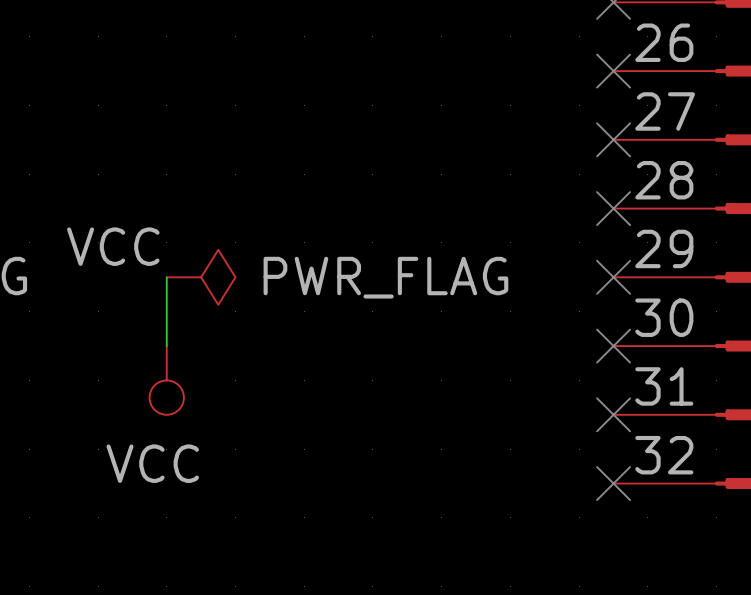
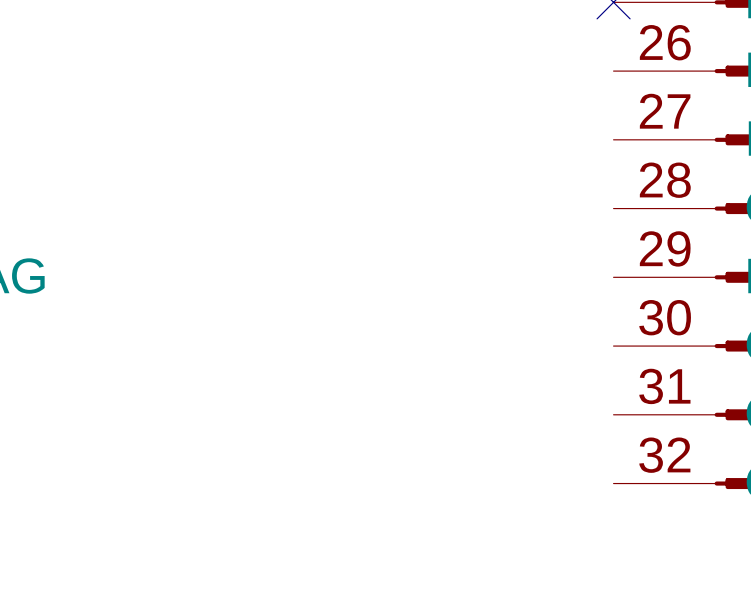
no-connect mark: (613, 71) -> none
no-connect mark: (613, 139) -> none
no-connect mark: (613, 208) -> none
label: VCC (113, 246) -> none
wire: (166, 277) (166, 346) -> none
power symbol: PWR_FLAG (201, 277) -> none
no-connect mark: (613, 277) -> none
no-connect mark: (613, 346) -> none
power symbol: VCC (166, 380) -> none
no-connect mark: (613, 414) -> none
no-connect mark: (613, 483) -> none

